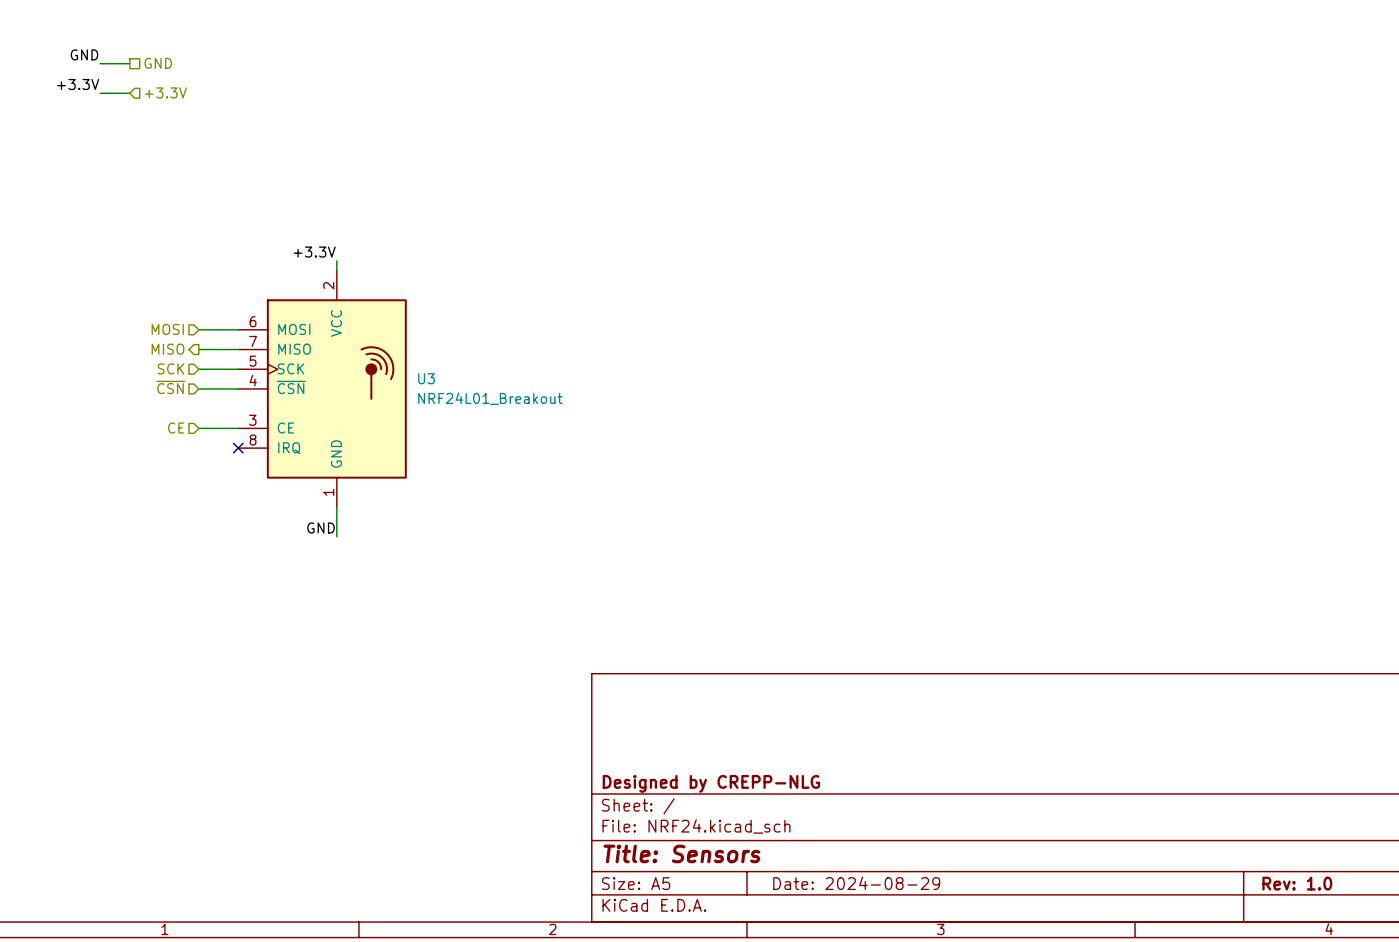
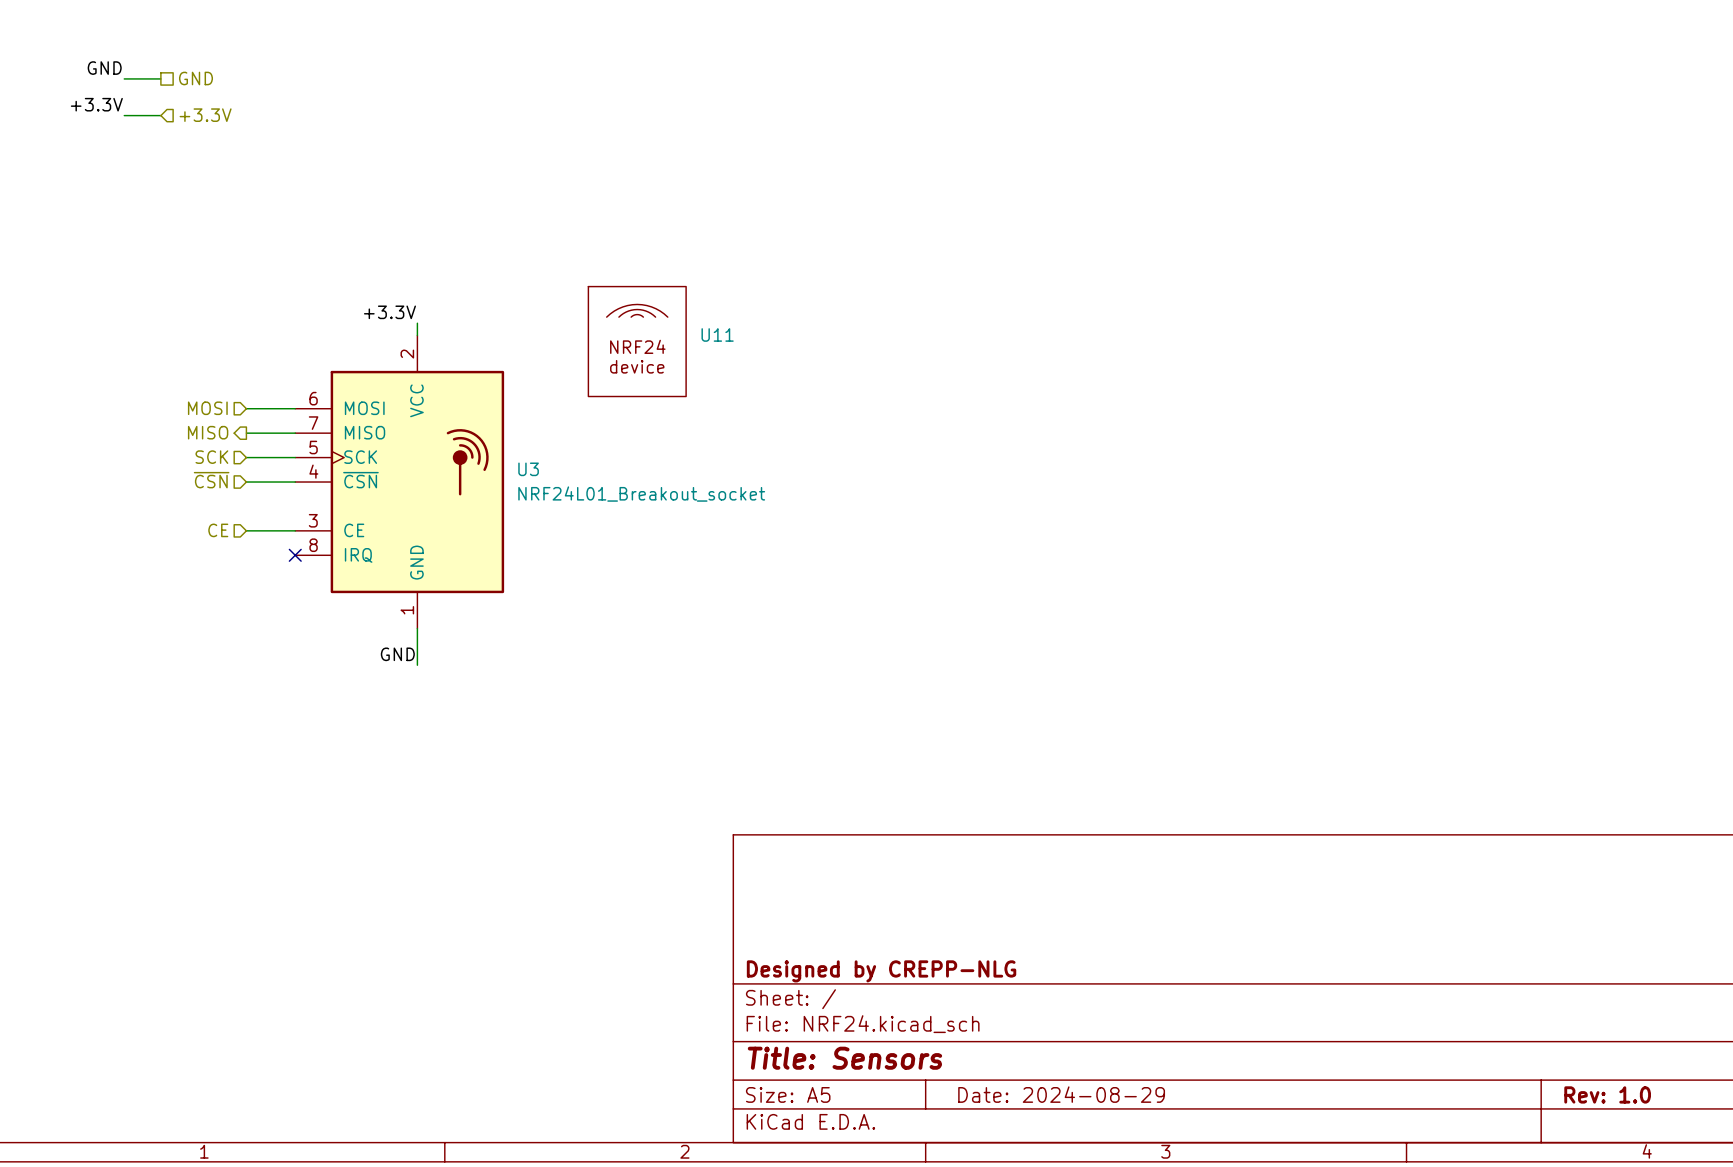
U11: none -> (637, 341)
U3 value: NRF24L01_Breakout (490, 398) -> NRF24L01_Breakout_socket (641, 494)

